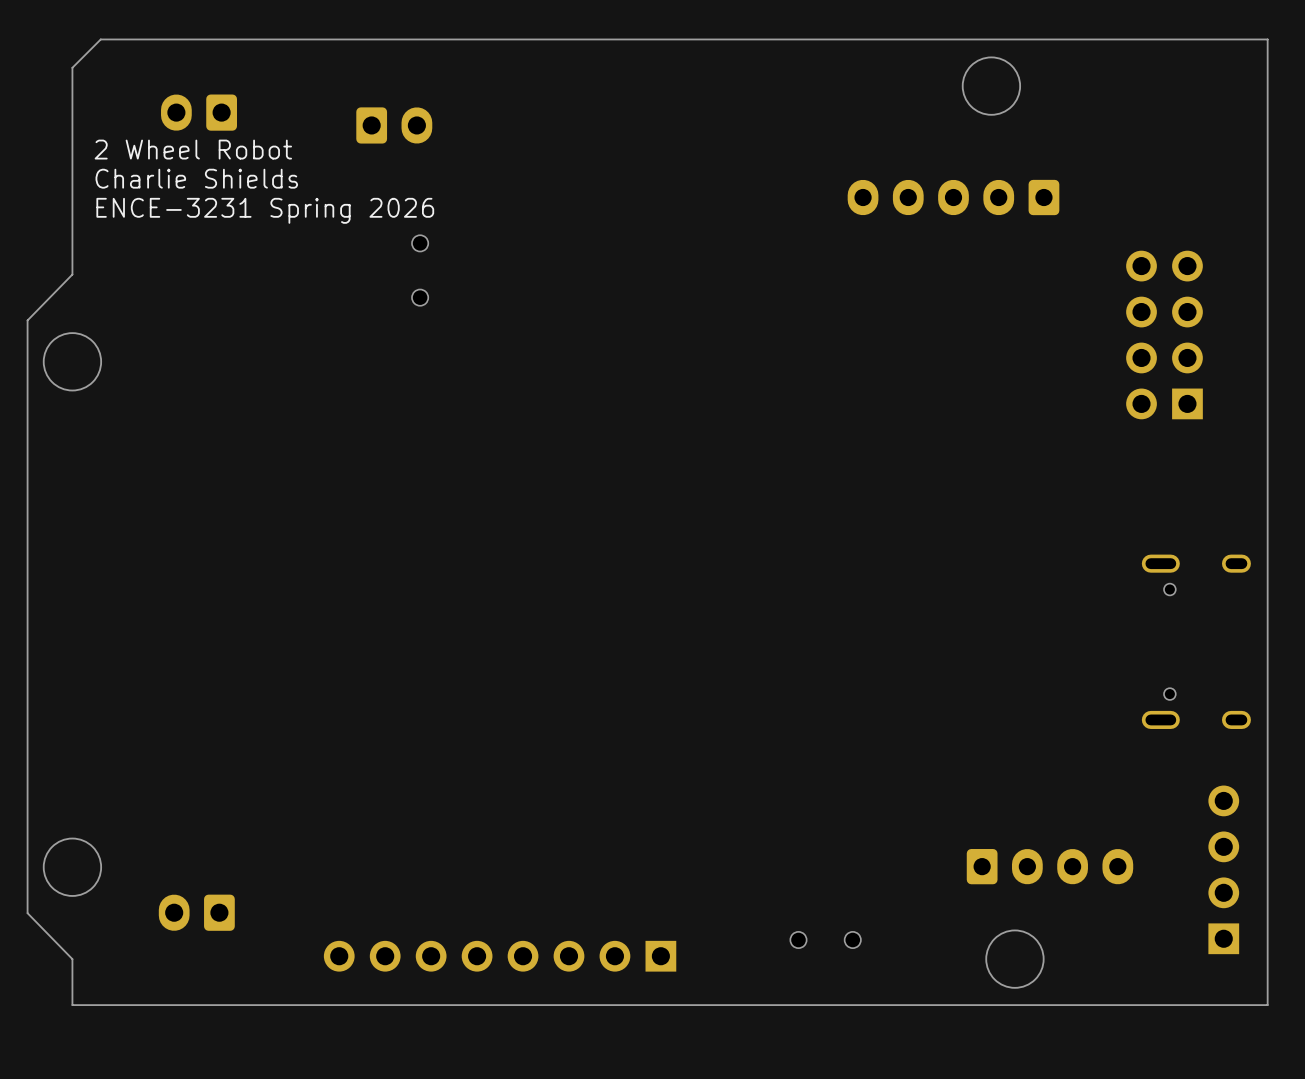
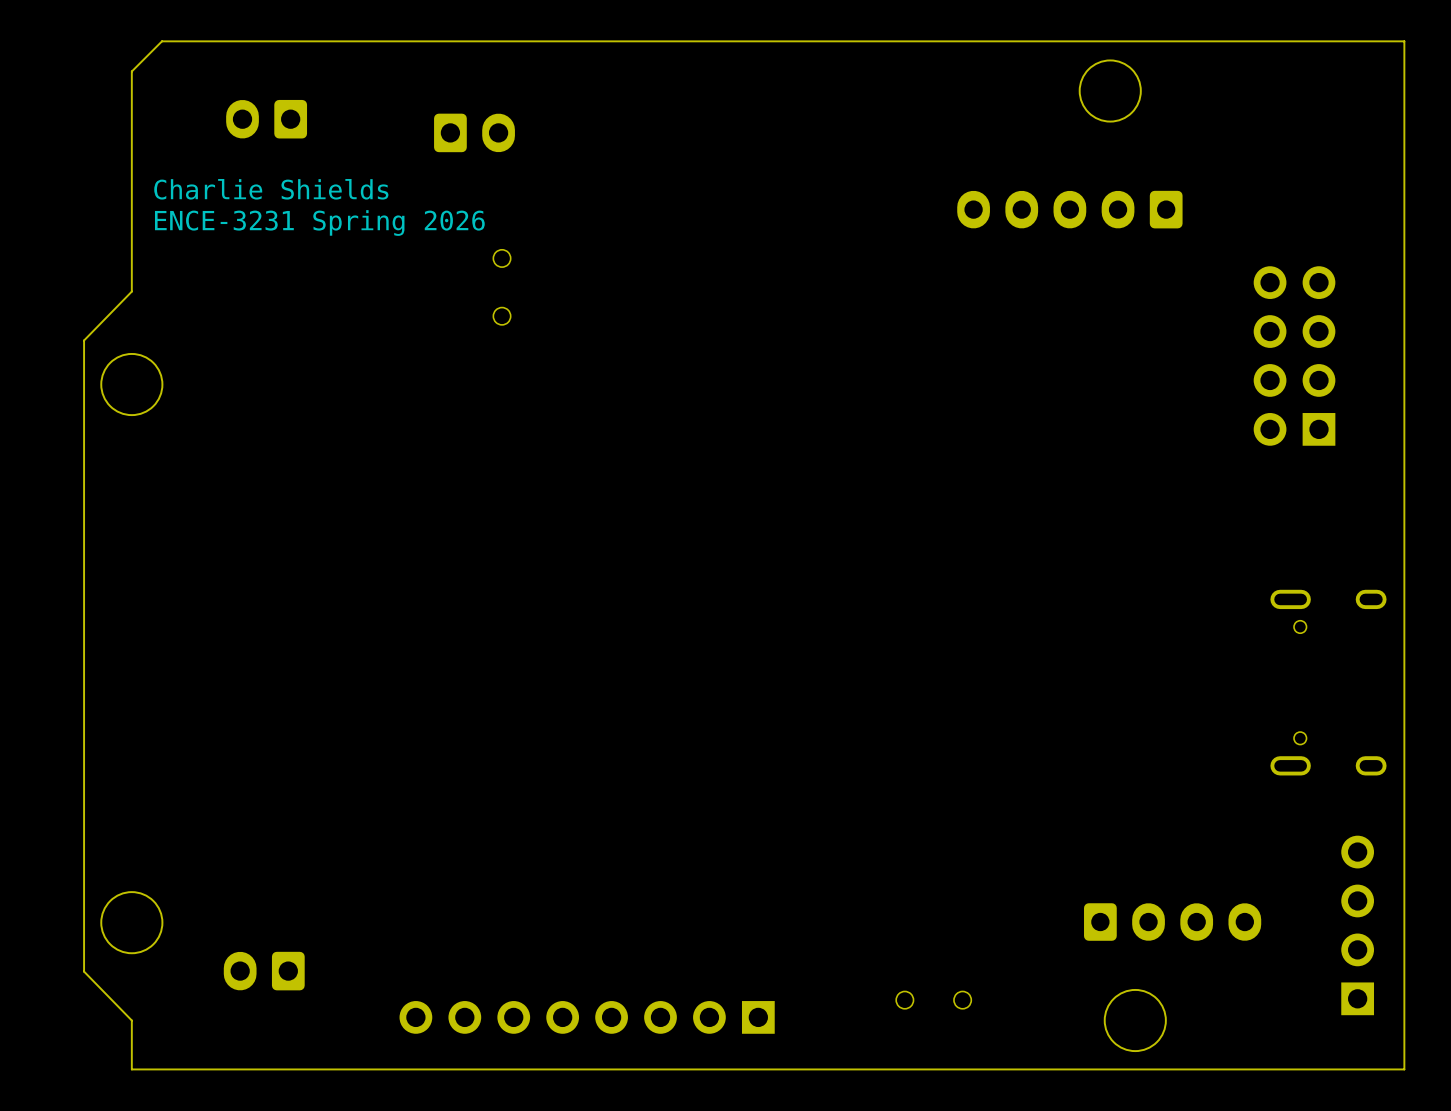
text: 2 Wheel Robot (193, 149) -> none

